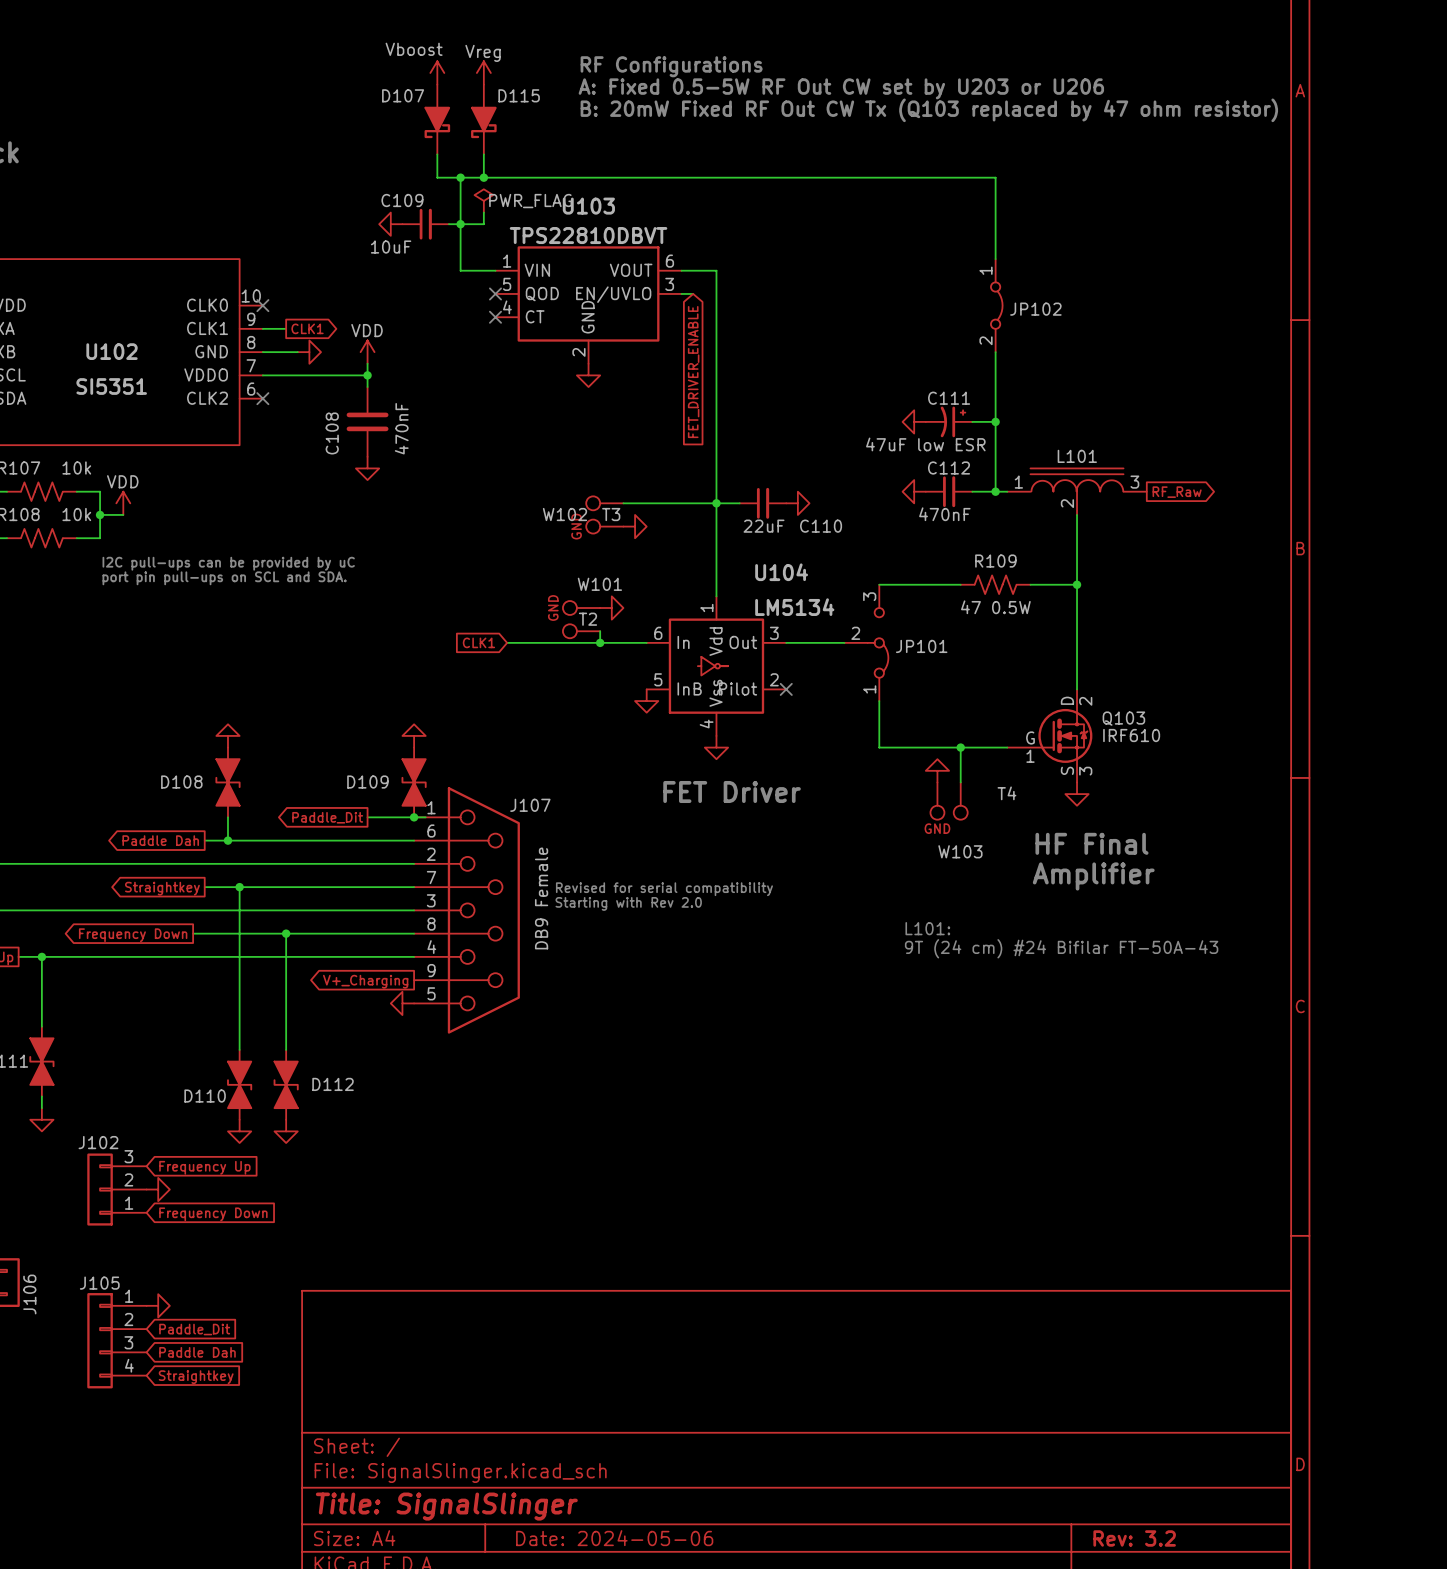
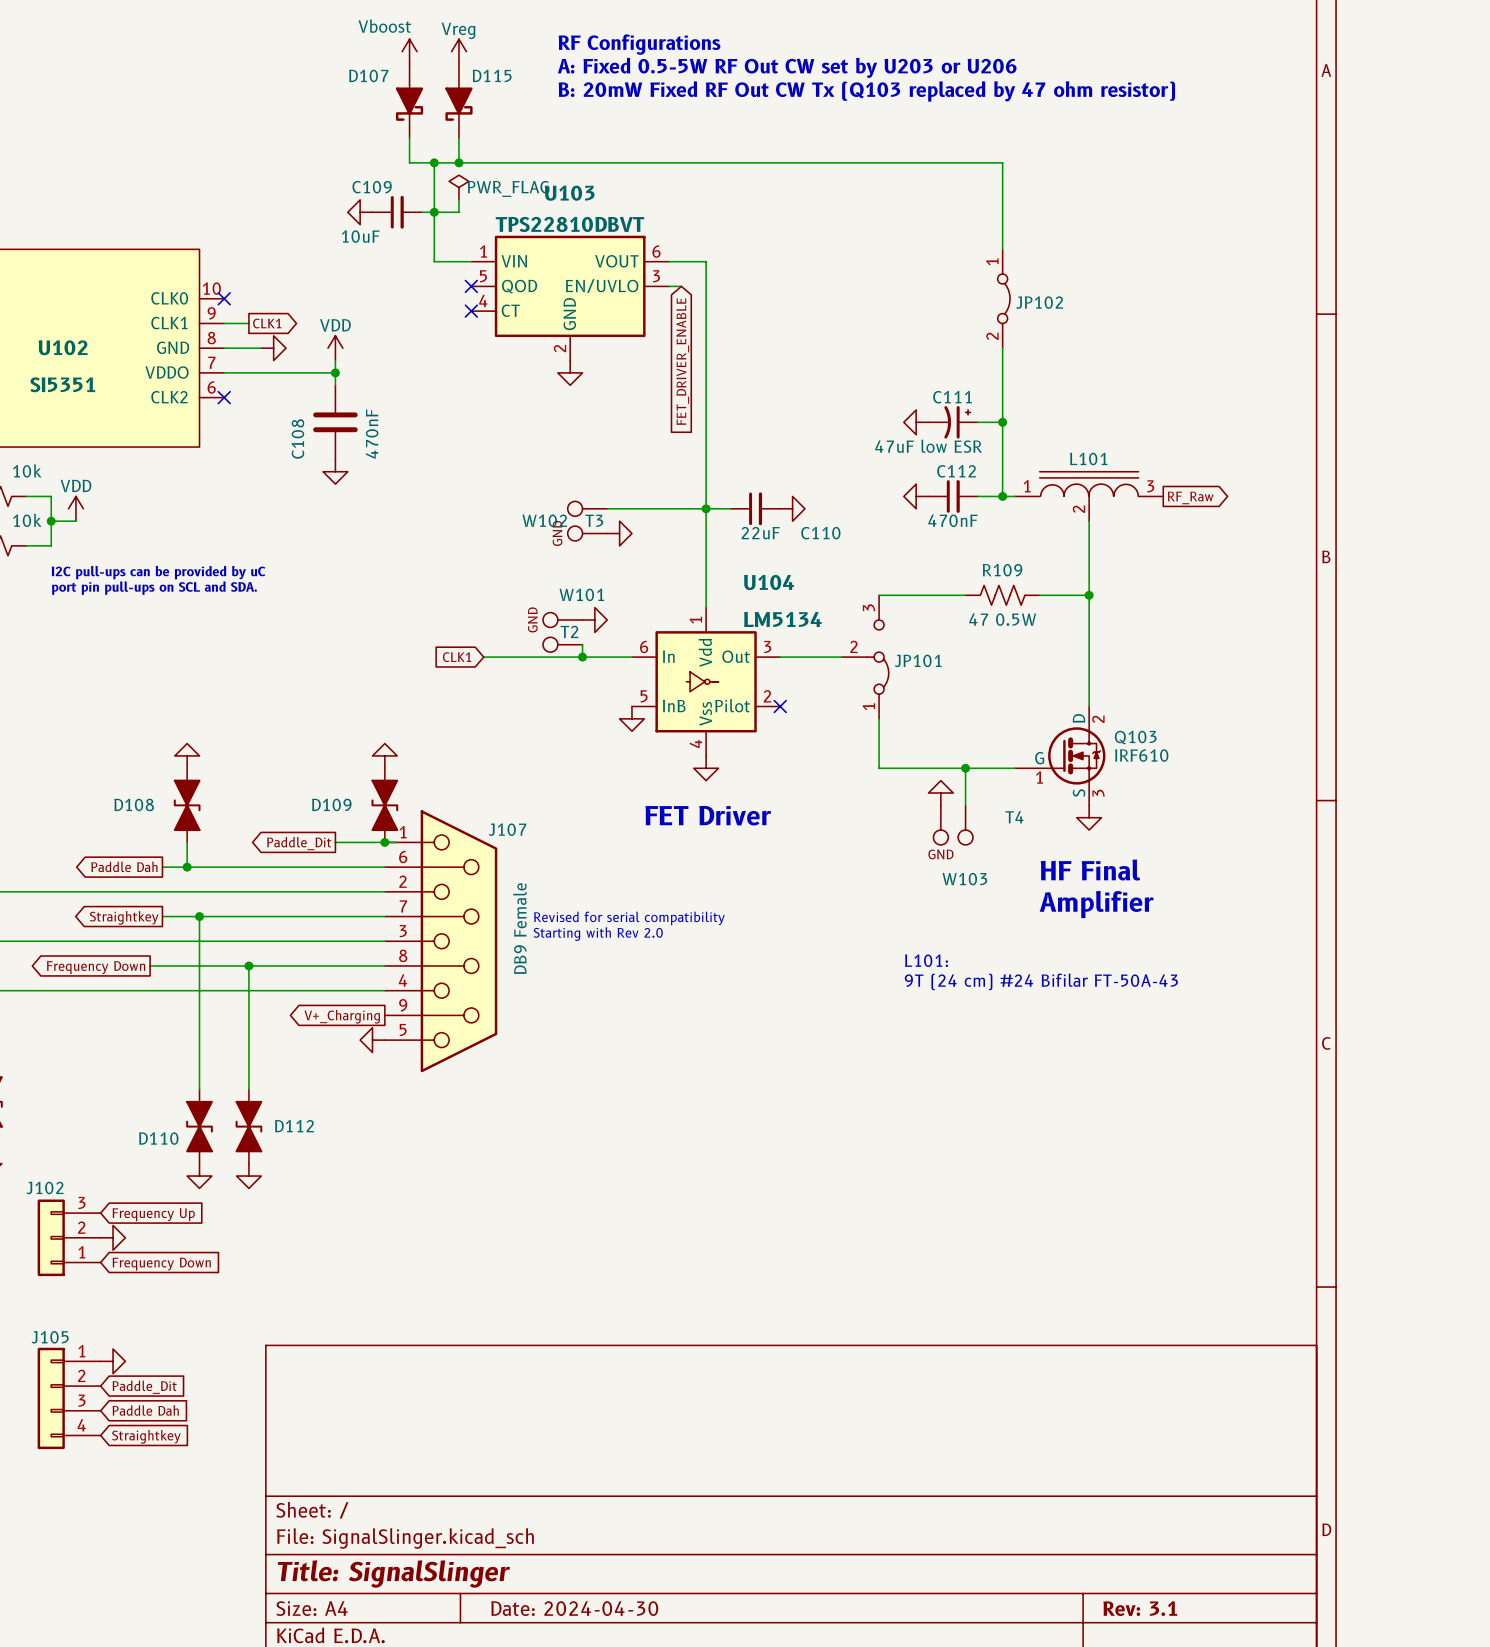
title block: Date: 2024-05-06 (614, 1538) -> Date: 2024-04-30 (574, 1608)
title block: Rev: 3.2 (1134, 1538) -> Rev: 3.1 (1140, 1608)

